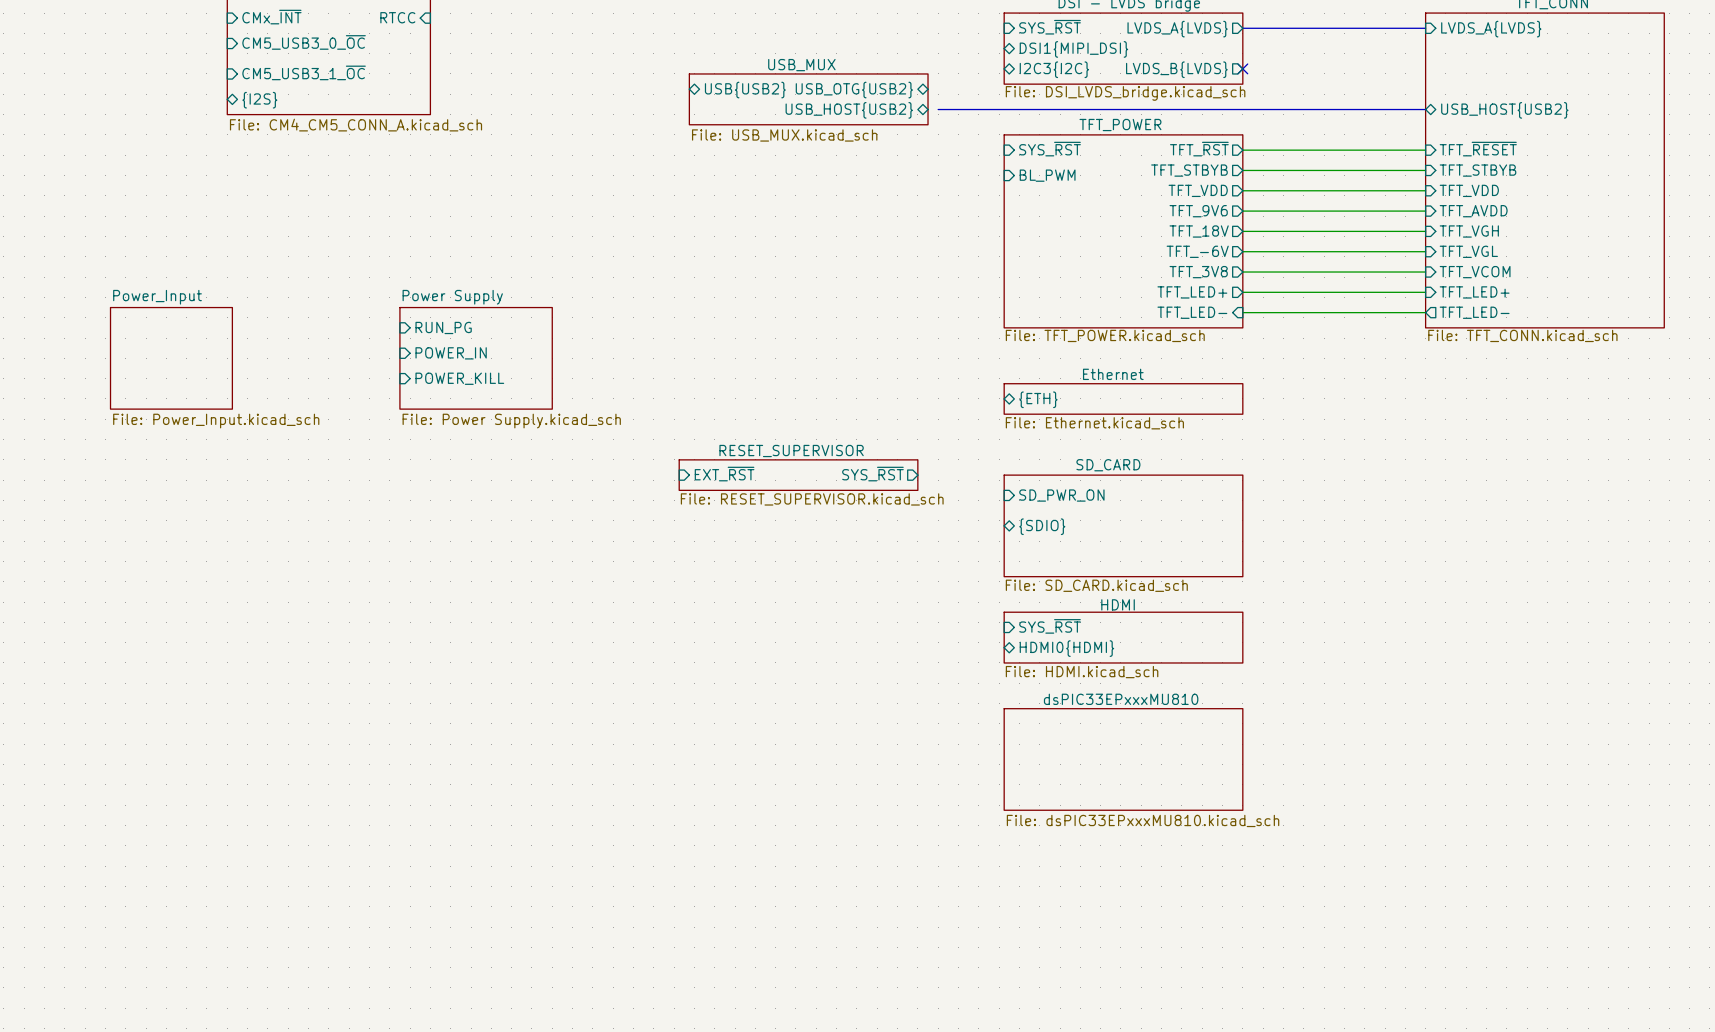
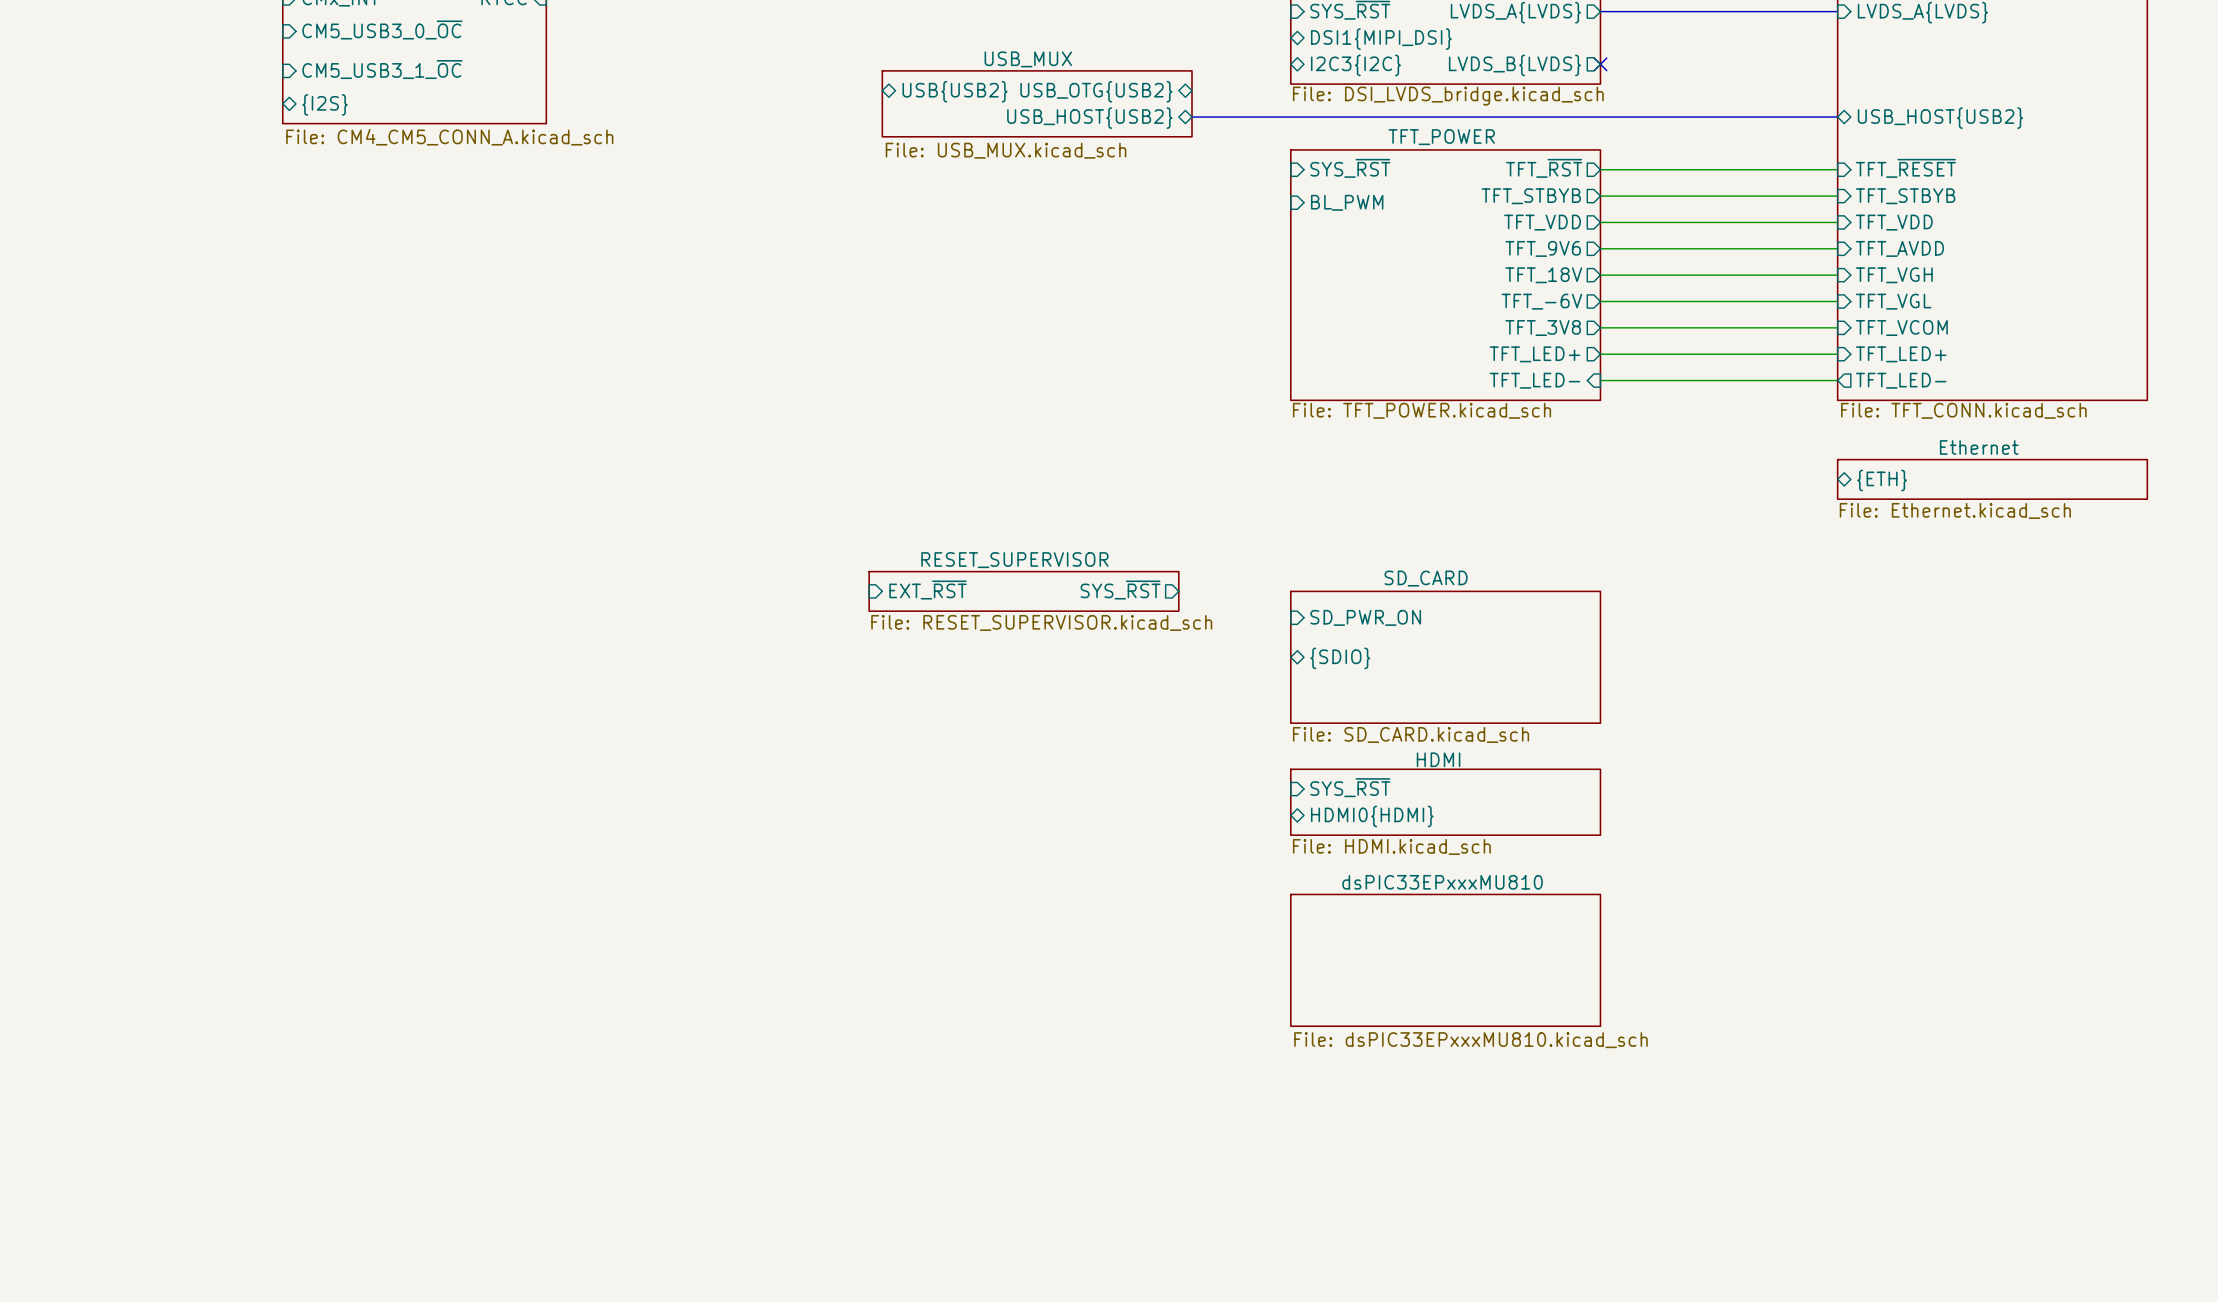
bus: none -> (1191, 117) (1205, 117)
sheet pin: RUN_PG (443, 327) -> none
sheet pin: POWER_IN (451, 353) -> none
sheet Power_Input: File: Power_Input.kicad_sch (171, 358) -> none
sheet Power Supply: File: Power Supply.kicad_sch (476, 358) -> none
sheet pin: POWER_KILL (459, 378) -> none
sheet Ethernet: none -> File: Ethernet.kicad_sch (1992, 479)
sheet pin: none -> {ETH} (1882, 480)
sheet Ethernet: File: Ethernet.kicad_sch (1123, 398) -> none
sheet pin: {ETH} (1038, 399) -> none

